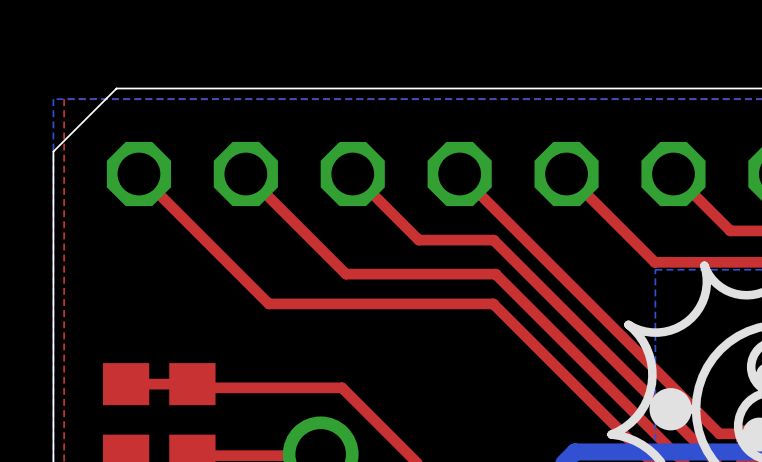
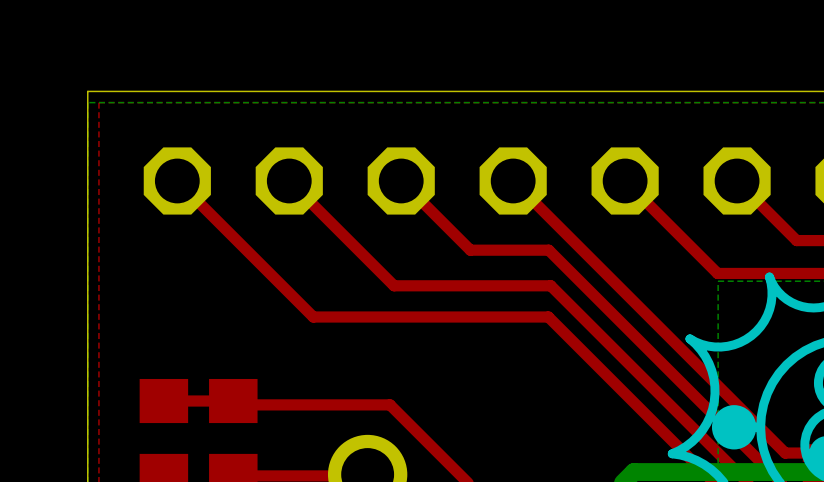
board edge: (116, 88) (53, 151) -> (153, 91) (87, 91) (87, 157)

